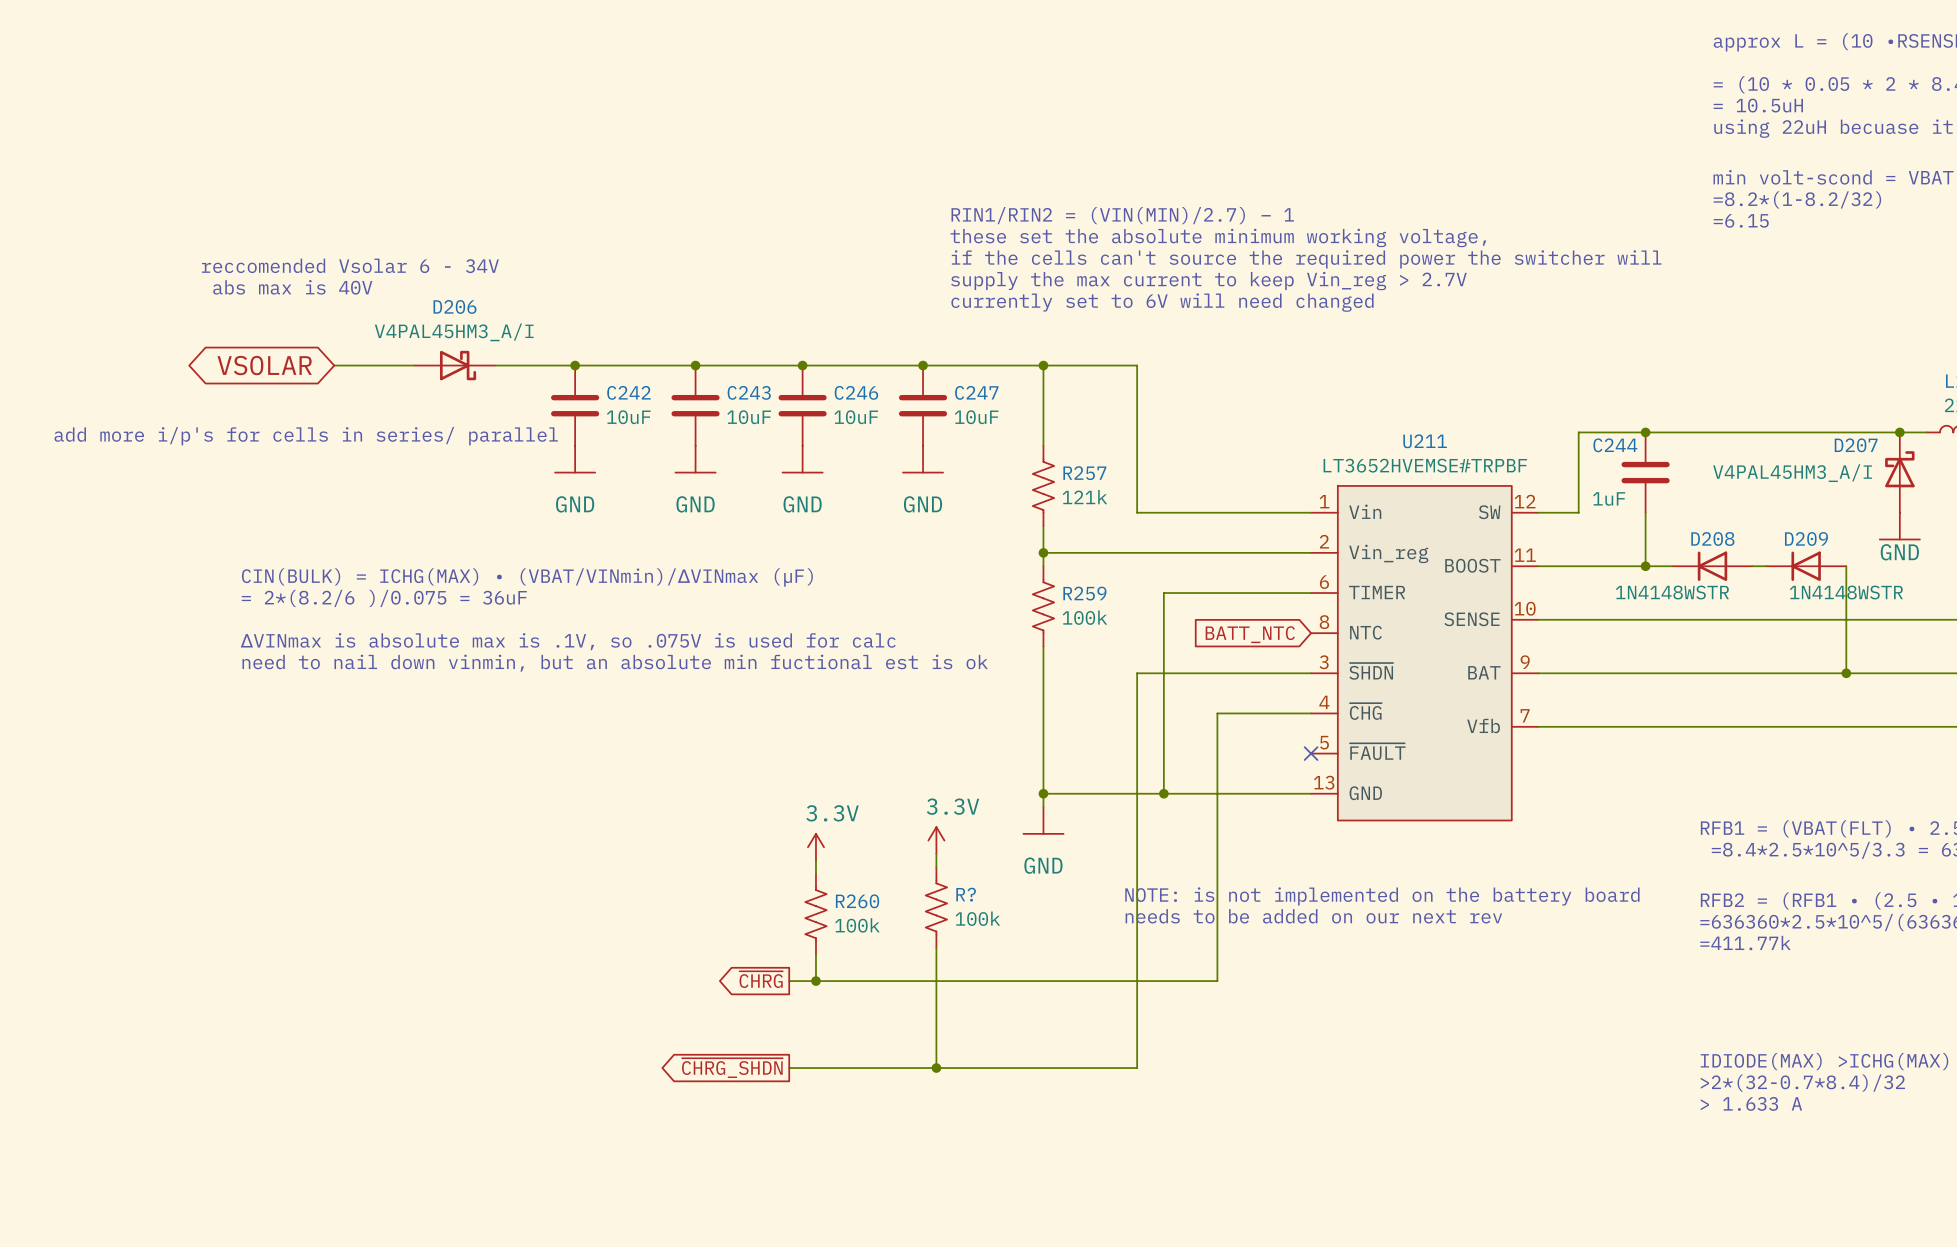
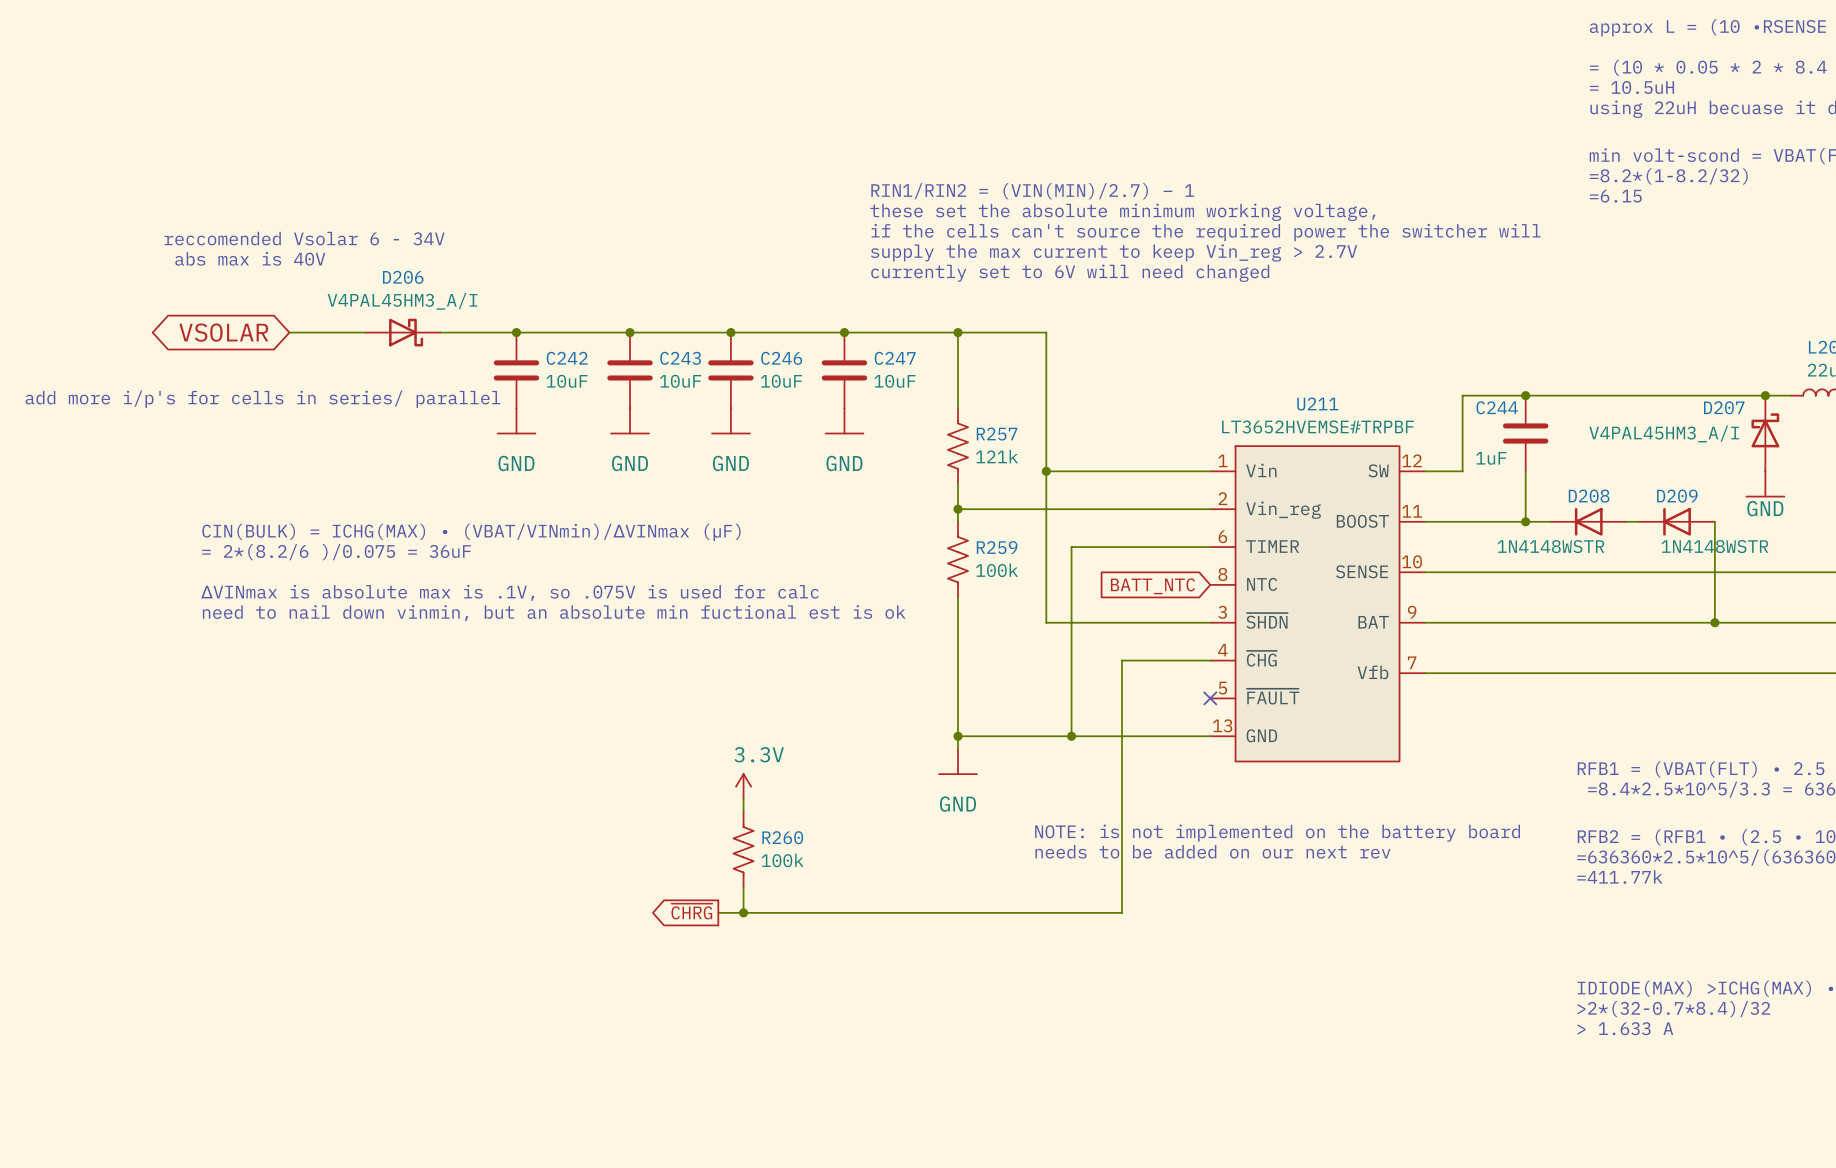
junction: none -> (1046, 471)
wire: (1137, 673) (1137, 1068) (789, 1068) -> (1046, 622) (1046, 471)
power symbol: 3.3V (936, 840) -> none
wire: (936, 853) (936, 867) -> none
R?: 100k (936, 907) -> none
wire: (936, 947) (936, 1068) -> none
global label: ~{CHRG_SHDN} (732, 1068) -> none
junction: (936, 1068) -> none

